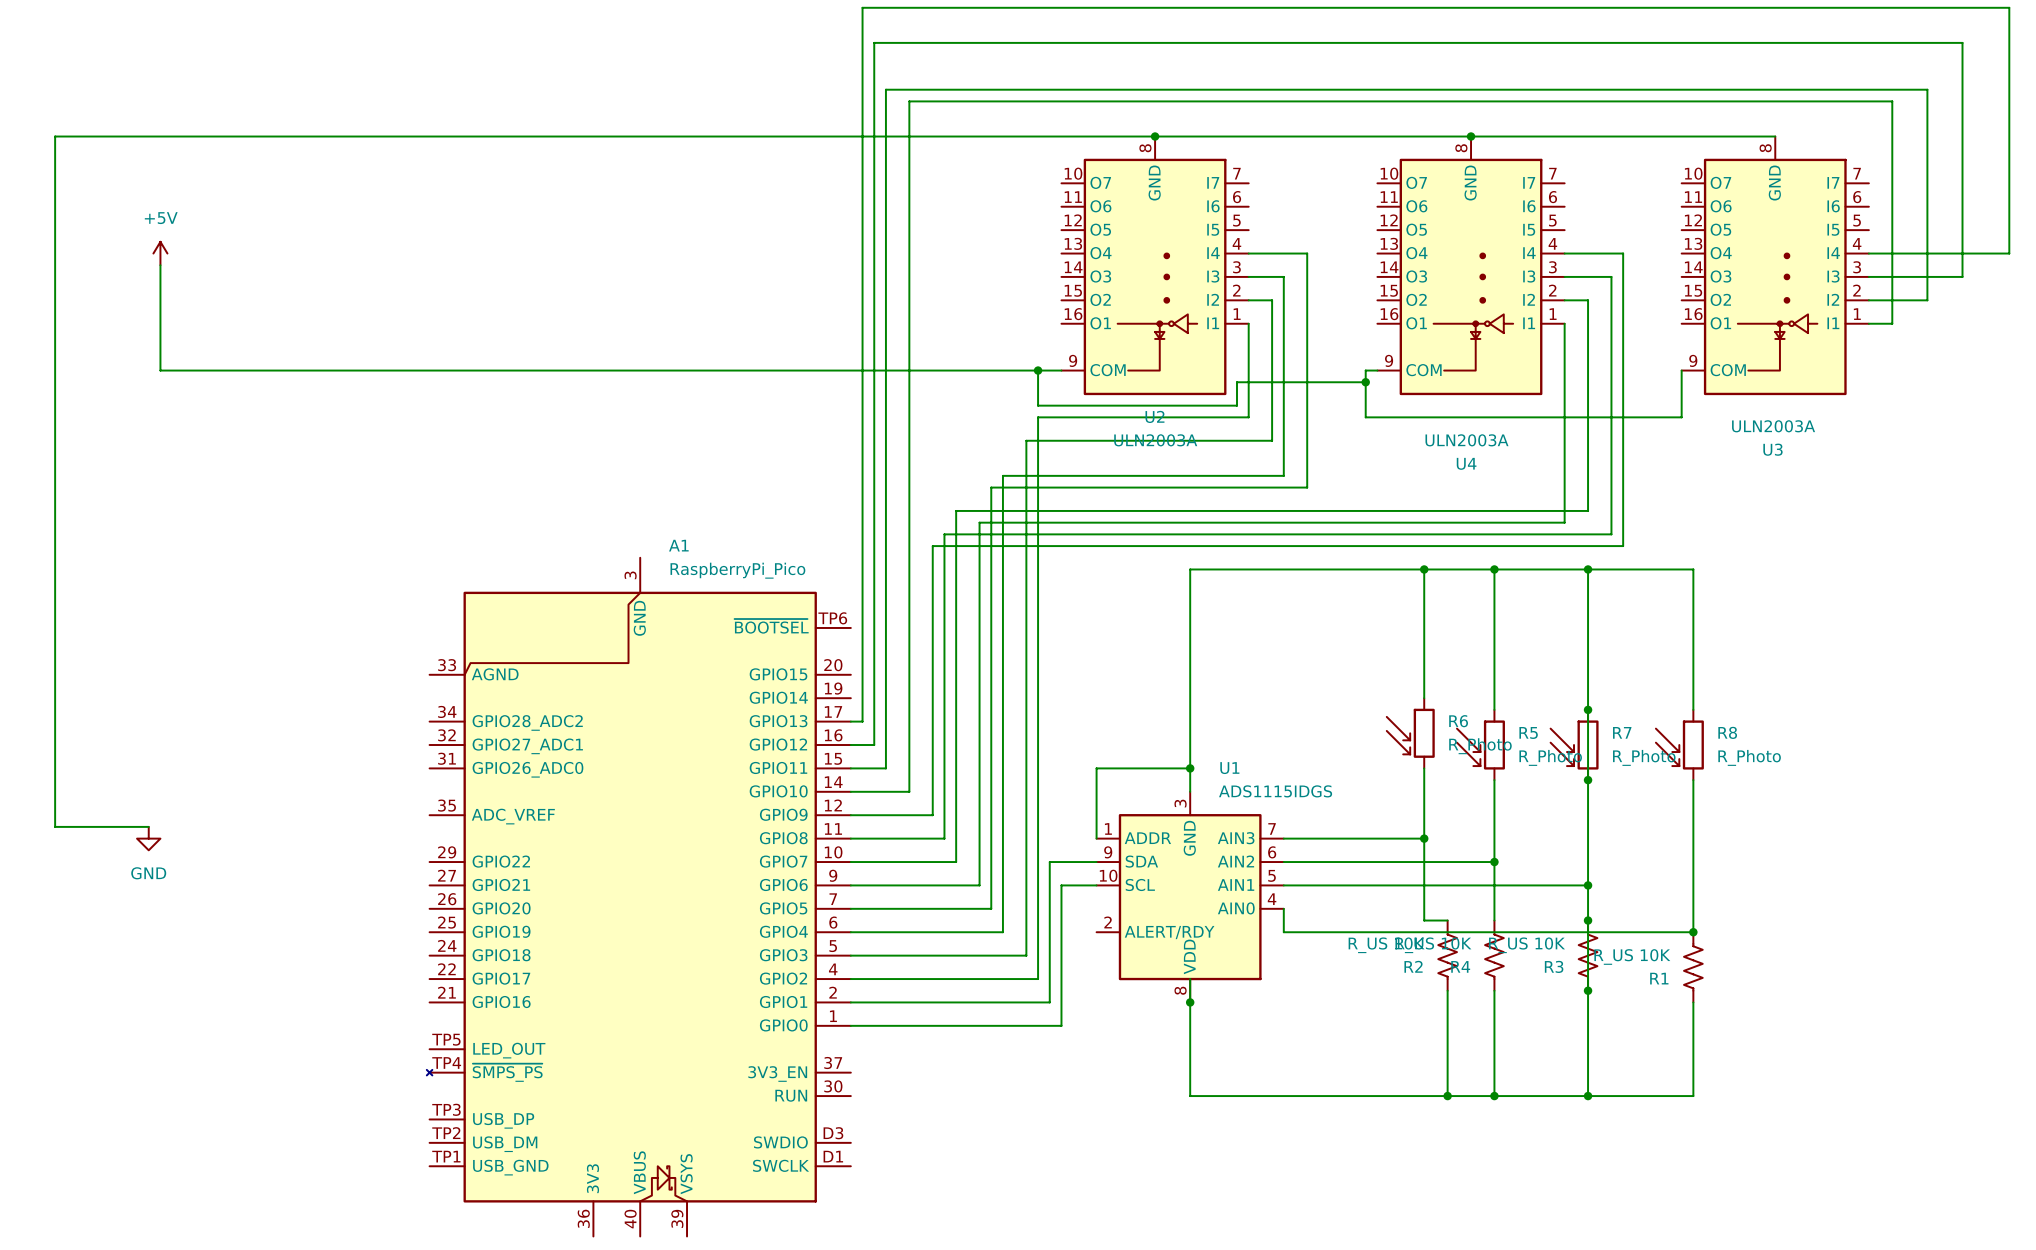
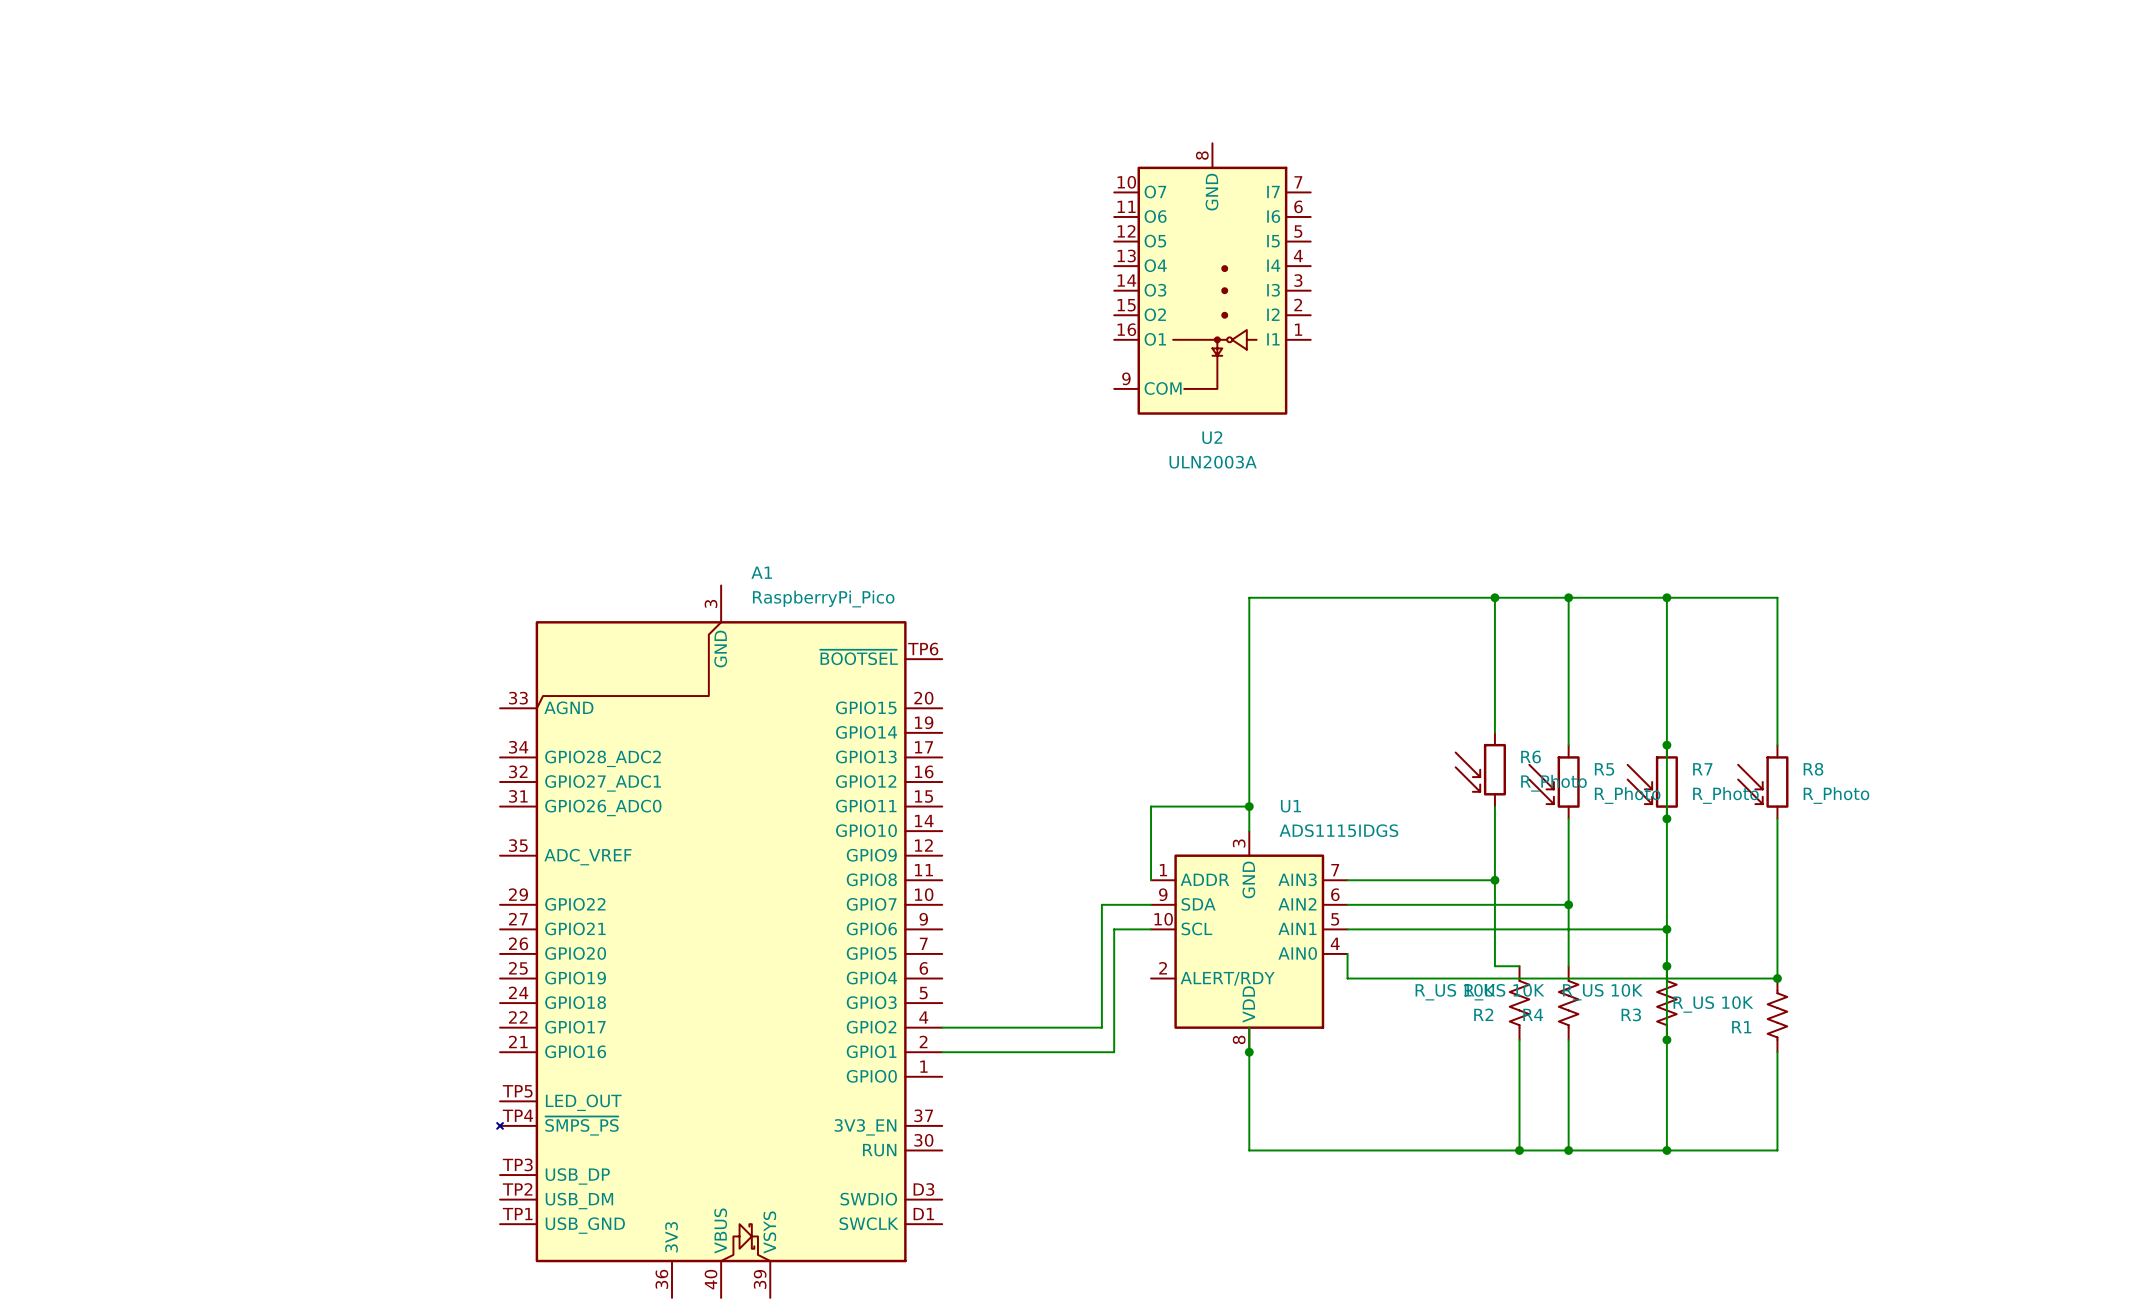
junction: (1155, 136) -> none
junction: (1471, 136) -> none
wire: (1775, 136) (55, 136) (55, 826) (148, 826) -> none
power symbol: +5V (160, 253) -> none
wire: (1248, 253) (1307, 253) (1307, 487) (991, 487) (991, 908) (850, 908) -> none
wire: (1564, 253) (1623, 253) (1623, 546) (932, 546) (932, 815) (850, 815) -> none
wire: (1868, 253) (2009, 253) (2009, 7) (862, 7) (862, 721) (850, 721) -> none
wire: (160, 265) (160, 370) (1061, 370) -> none
U4: ULN2003A (1471, 265) -> none
U3: ULN2003A (1775, 265) -> none
wire: (1248, 276) (1283, 276) (1283, 475) (1002, 475) (1002, 932) (850, 932) -> none
wire: (1564, 276) (1611, 276) (1611, 534) (944, 534) (944, 838) (850, 838) -> none
wire: (1868, 276) (1962, 276) (1962, 42) (874, 42) (874, 745) (850, 745) -> none
wire: (1248, 300) (1272, 300) (1272, 440) (1026, 440) (1026, 955) (850, 955) -> none
wire: (1564, 300) (1588, 300) (1588, 510) (956, 510) (956, 862) (850, 862) -> none
wire: (1868, 300) (1927, 300) (1927, 89) (885, 89) (885, 768) (850, 768) -> none
wire: (1248, 323) (1248, 417) (1038, 417) (1038, 979) -> (1101, 1027) (1089, 1027)
wire: (1564, 323) (1564, 522) (979, 522) (979, 885) (850, 885) -> none
wire: (1868, 323) (1892, 323) (1892, 101) (909, 101) (909, 791) (850, 791) -> none
wire: (1038, 370) (1038, 405) (1236, 405) (1236, 382) (1365, 382) -> none
junction: (1038, 370) -> none
wire: (1377, 370) (1365, 370) (1365, 417) (1681, 417) (1681, 370) -> none
junction: (1365, 382) -> none
power symbol: GND (148, 838) -> none
A1 position: (638, 897) -> (719, 941)
wire: (1049, 979) (1049, 1002) -> (1114, 1052) (1101, 1052)
wire: (1061, 1002) (1061, 1025) (850, 1025) -> none

